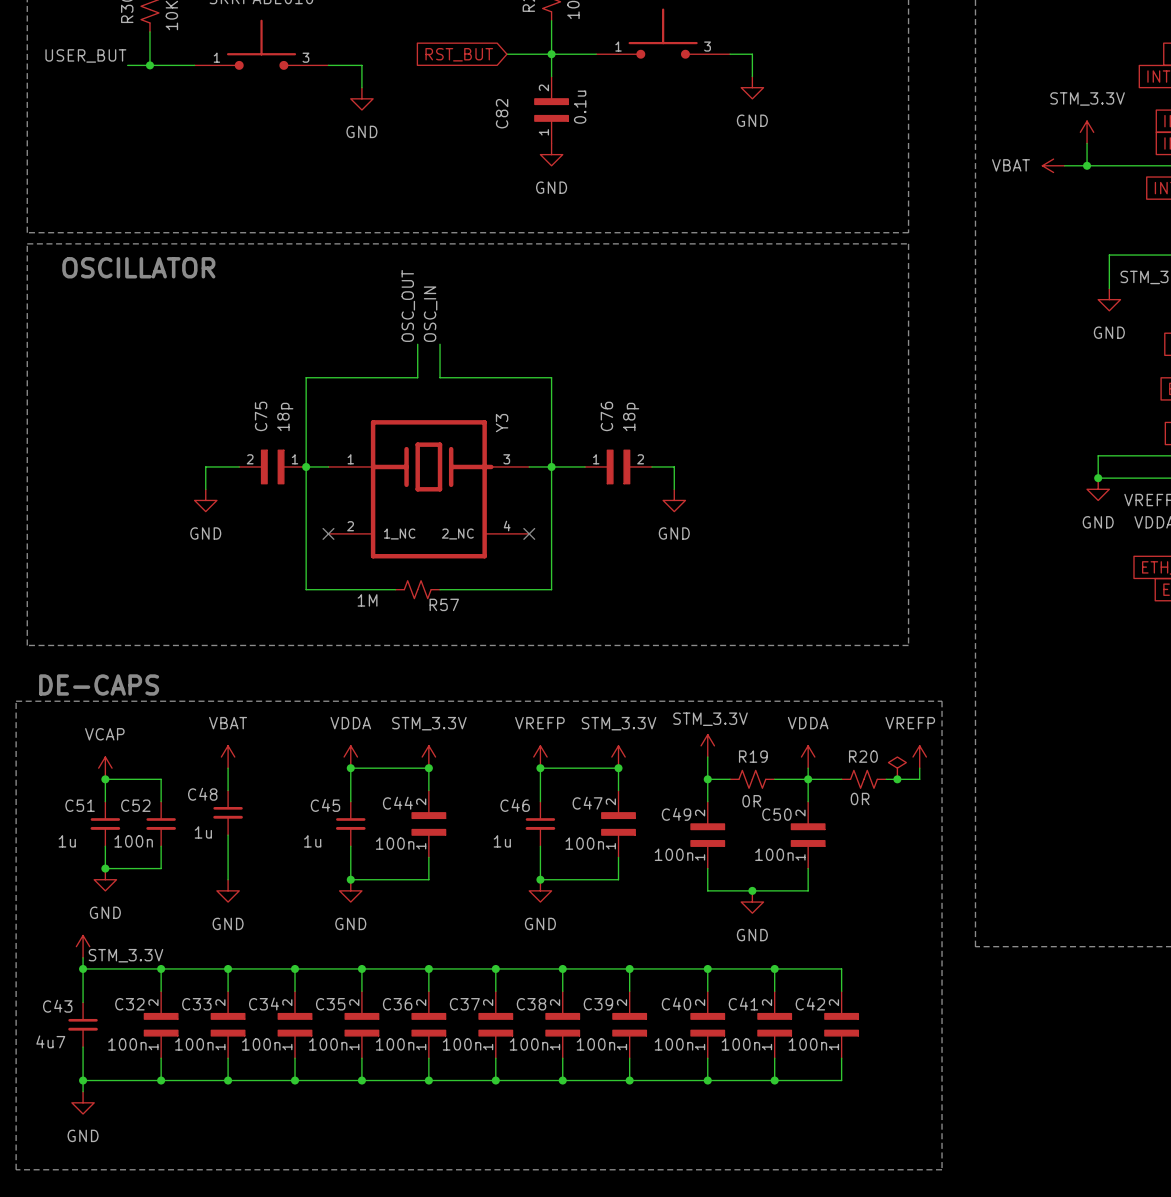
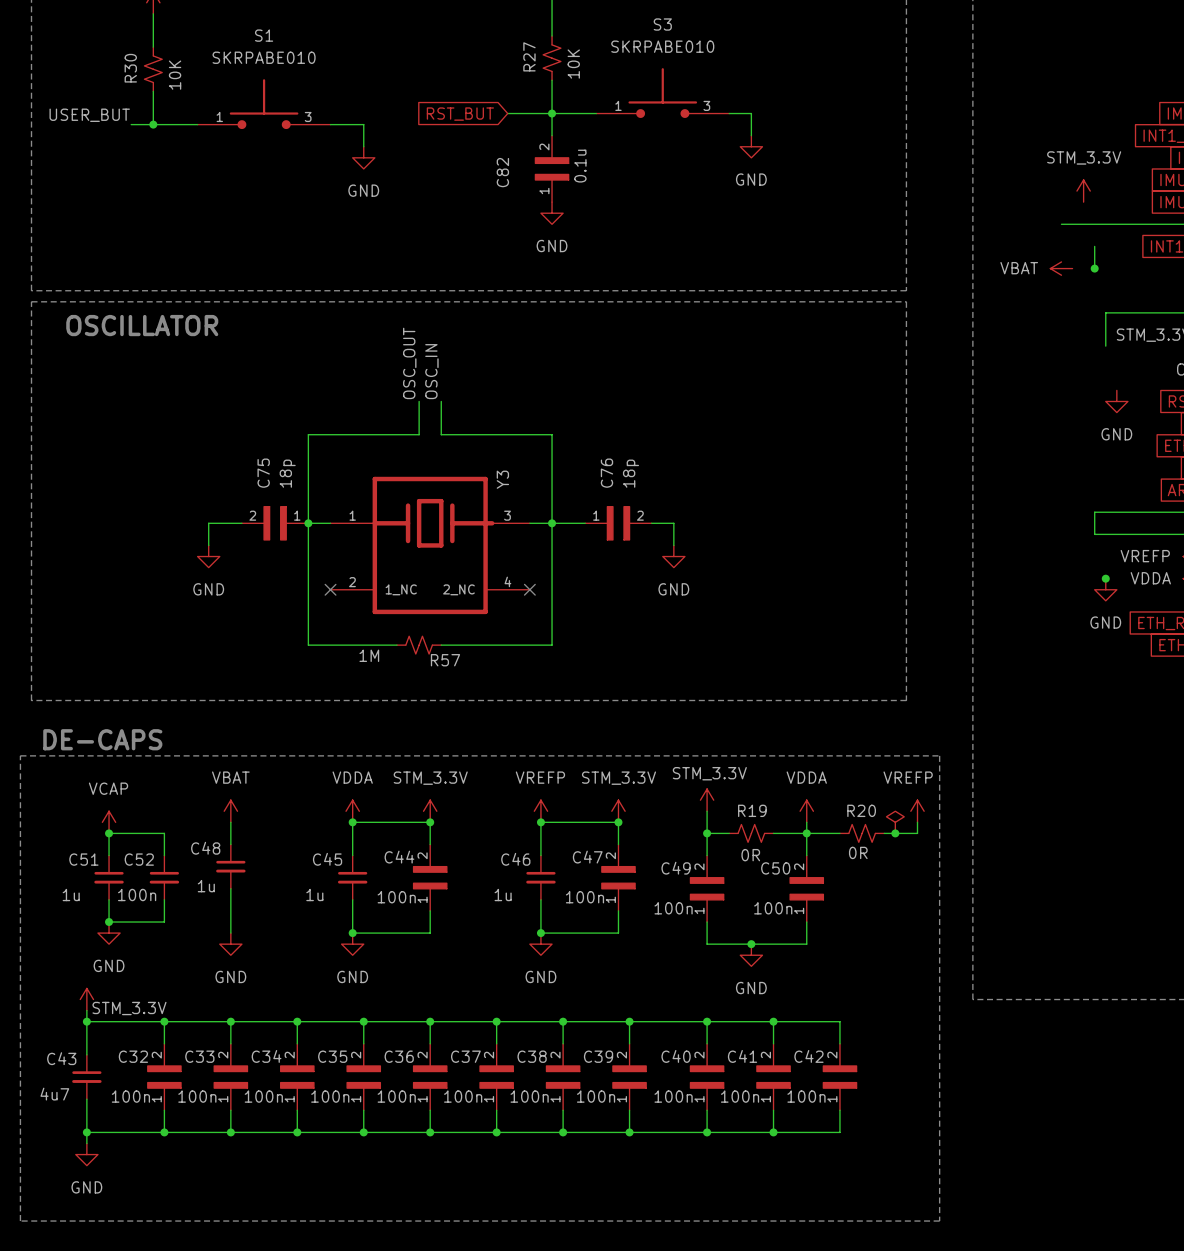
wire: (1087, 143) (1087, 165) -> (1094, 246) (1094, 268)
power symbol position: VBAT (1053, 165) -> VBAT (1061, 268)
junction position: (1087, 165) -> (1094, 268)
power symbol position: GND (1109, 299) -> GND (1116, 401)
junction position: (1098, 478) -> (1105, 578)
power symbol position: GND (1098, 489) -> GND (1105, 589)

